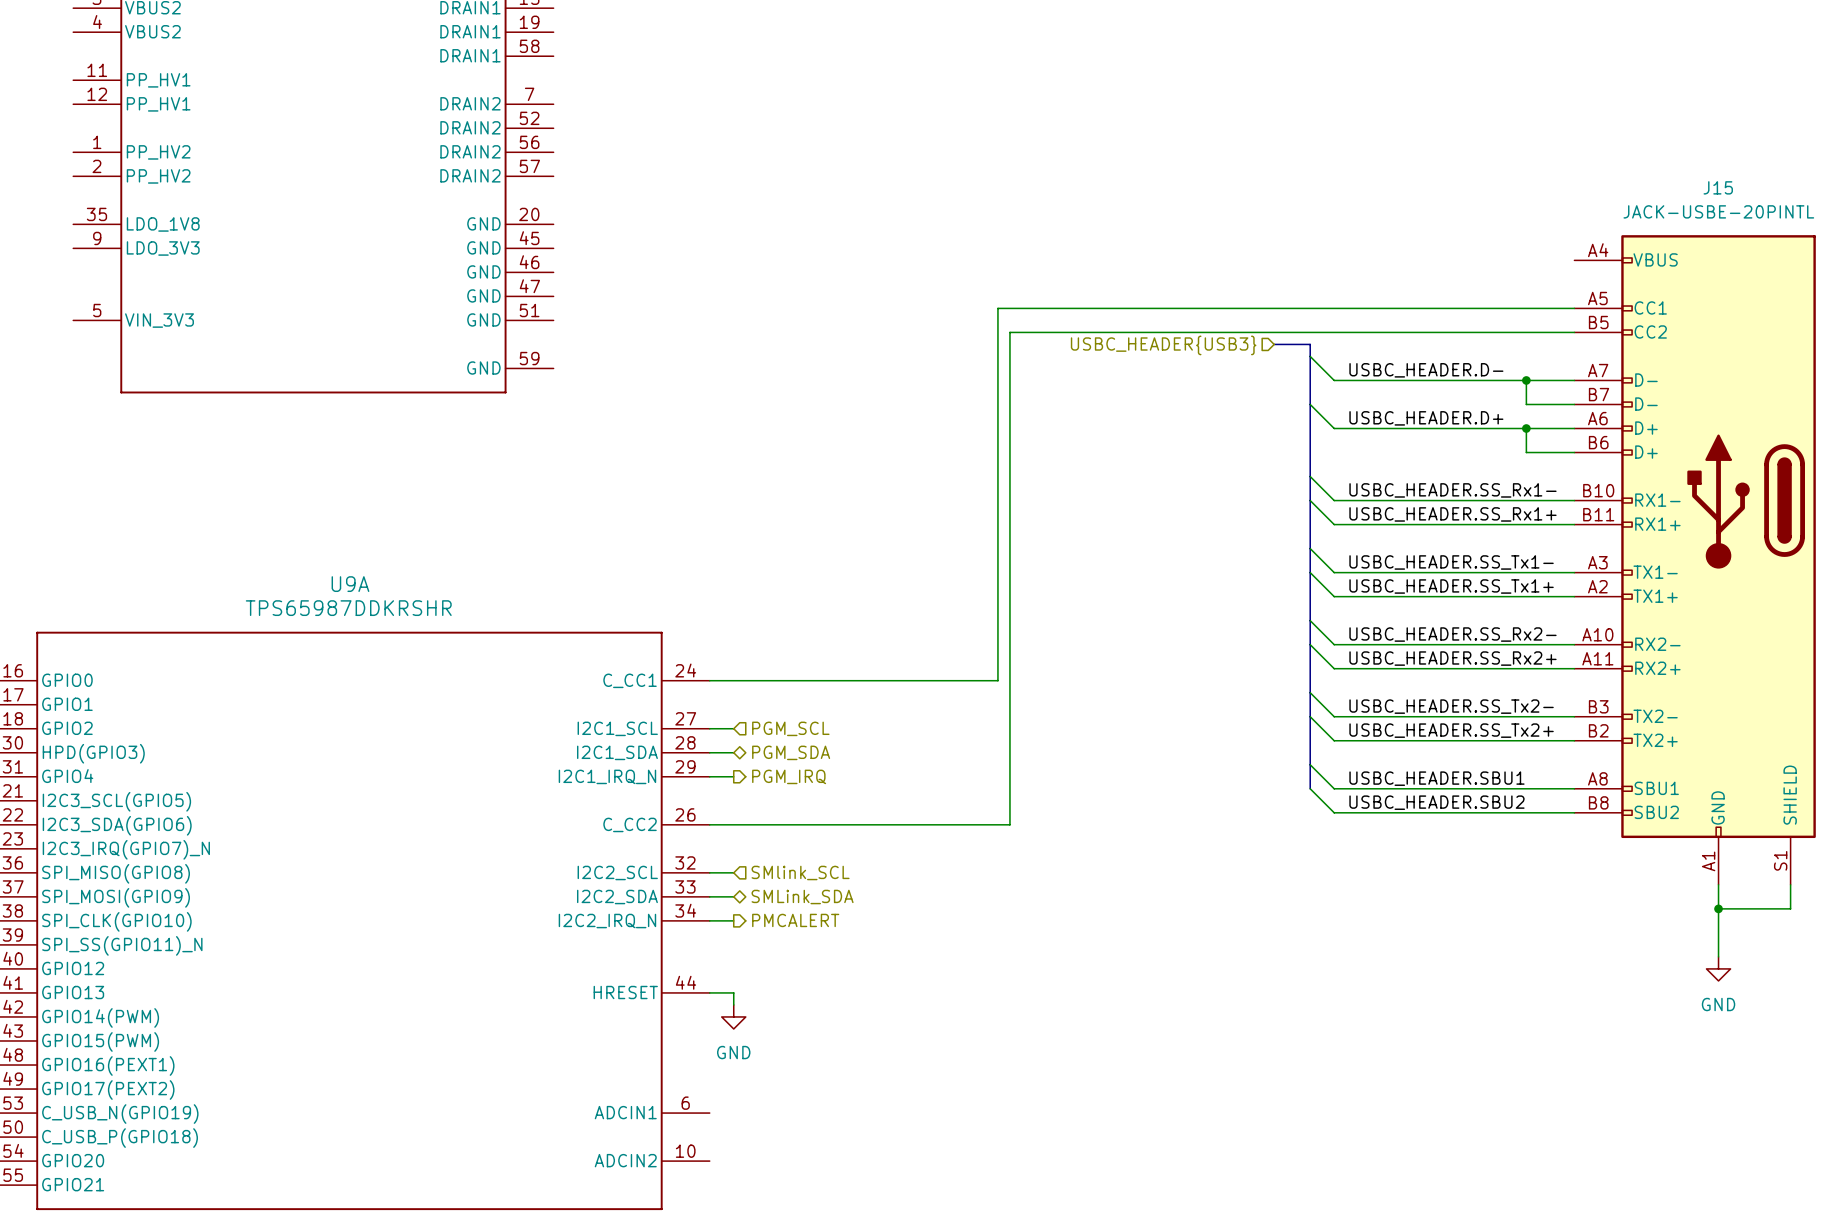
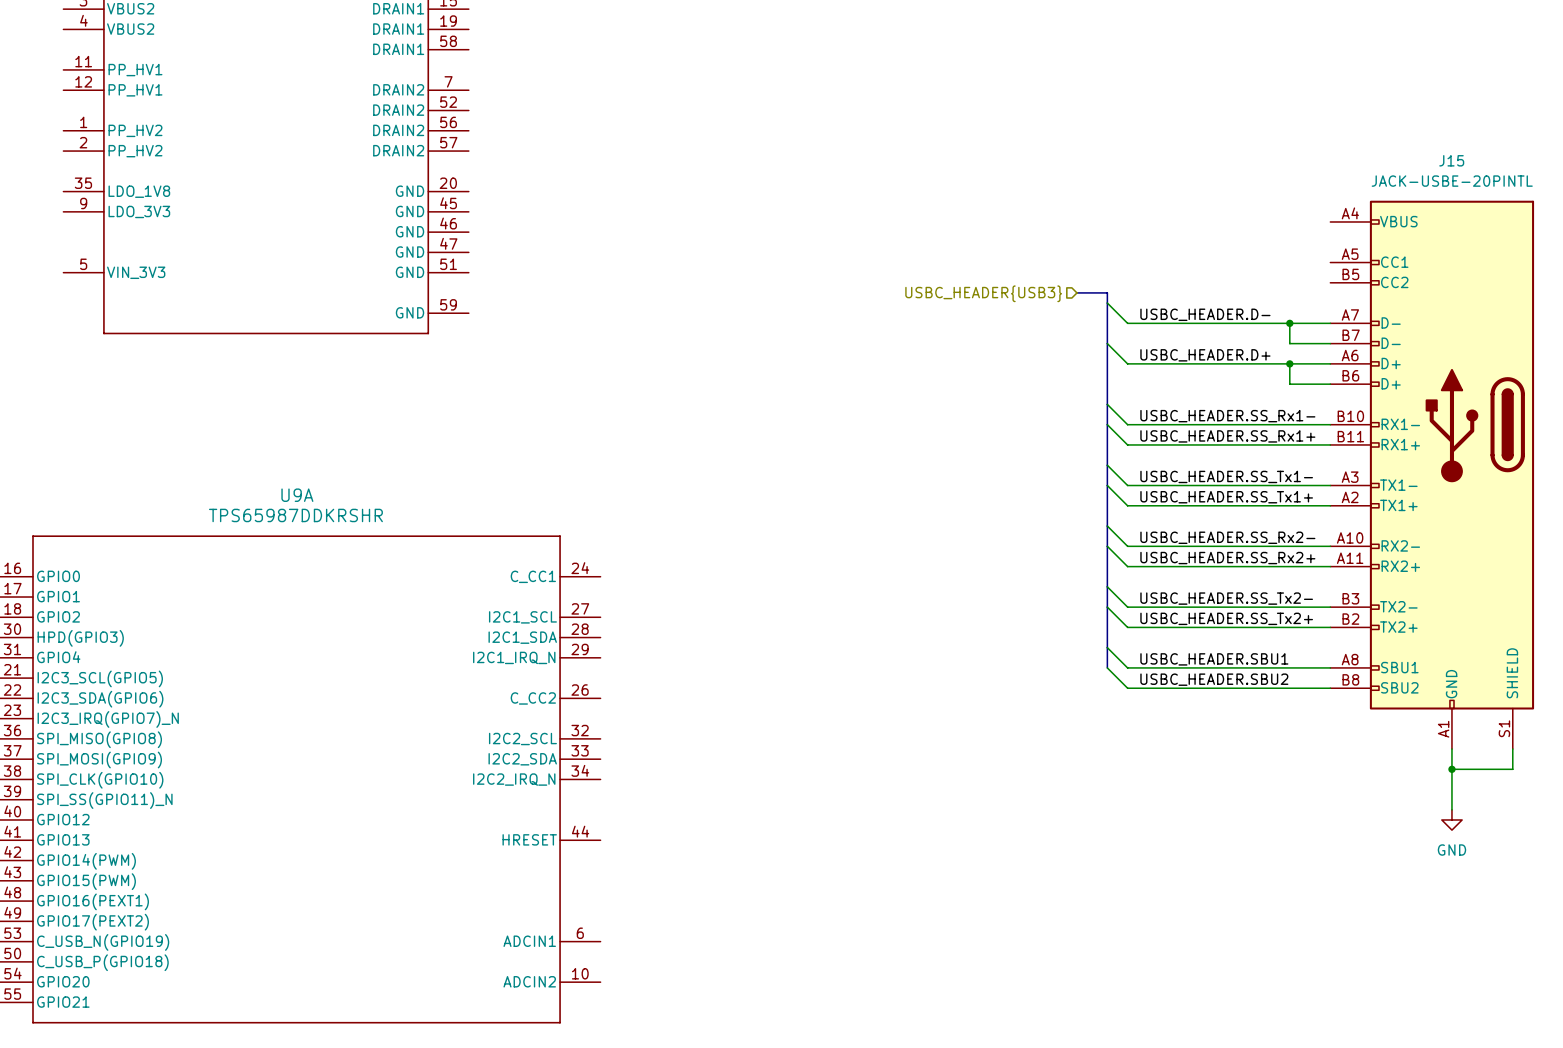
wire: (1574, 308) (997, 308) (997, 680) (709, 680) -> none
wire: (1574, 332) (1009, 332) (1009, 824) (709, 824) -> none
wire: (709, 728) (733, 728) -> none
hierarchical label: PGM_SCL (790, 728) -> none
wire: (709, 752) (733, 752) -> none
hierarchical label: PGM_SDA (791, 752) -> none
wire: (709, 776) (733, 776) -> none
hierarchical label: PGM_IRQ (789, 776) -> none
wire: (709, 872) (733, 872) -> none
hierarchical label: SMlink_SCL (800, 872) -> none
wire: (709, 896) (733, 896) -> none
hierarchical label: SMLink_SDA (802, 897) -> none
wire: (709, 920) (733, 920) -> none
hierarchical label: PMCALERT (795, 920) -> none
wire: (709, 992) (733, 992) (733, 1004) -> none
power symbol: GND (733, 1016) -> none

